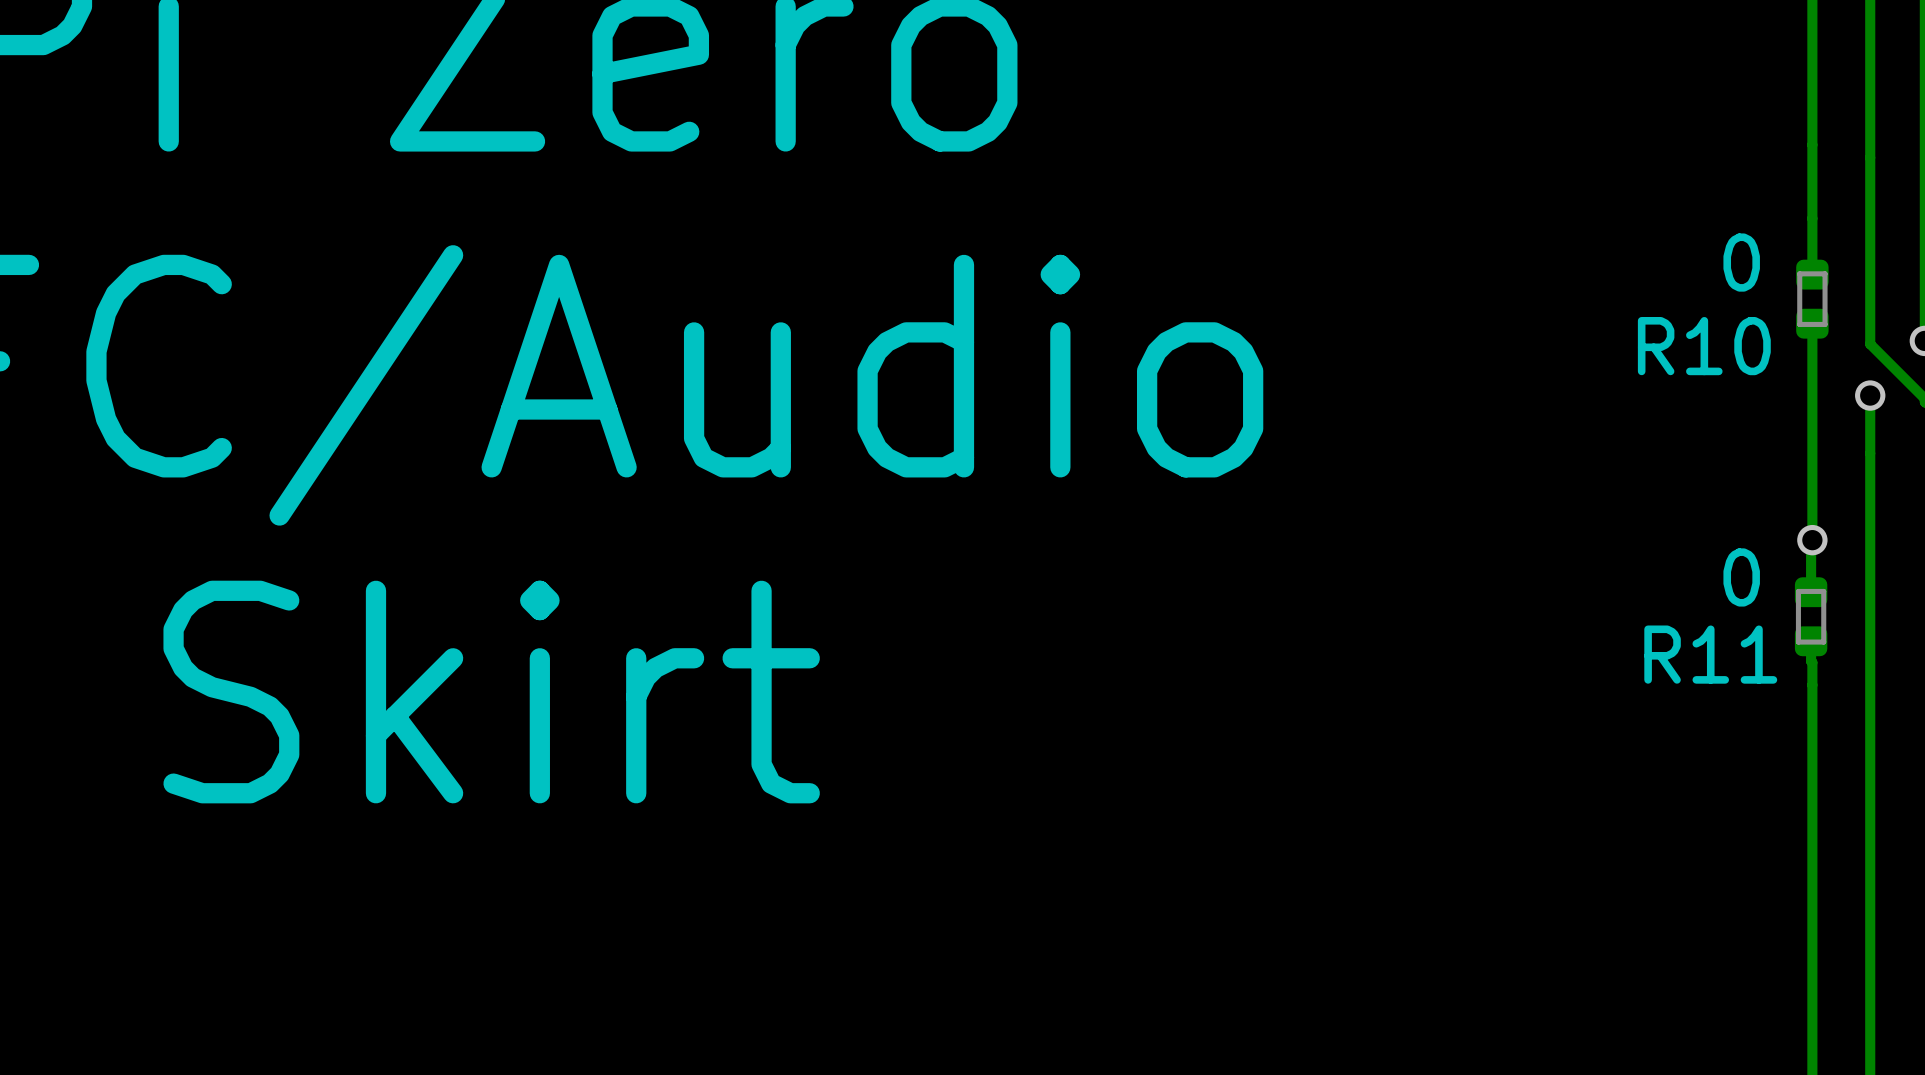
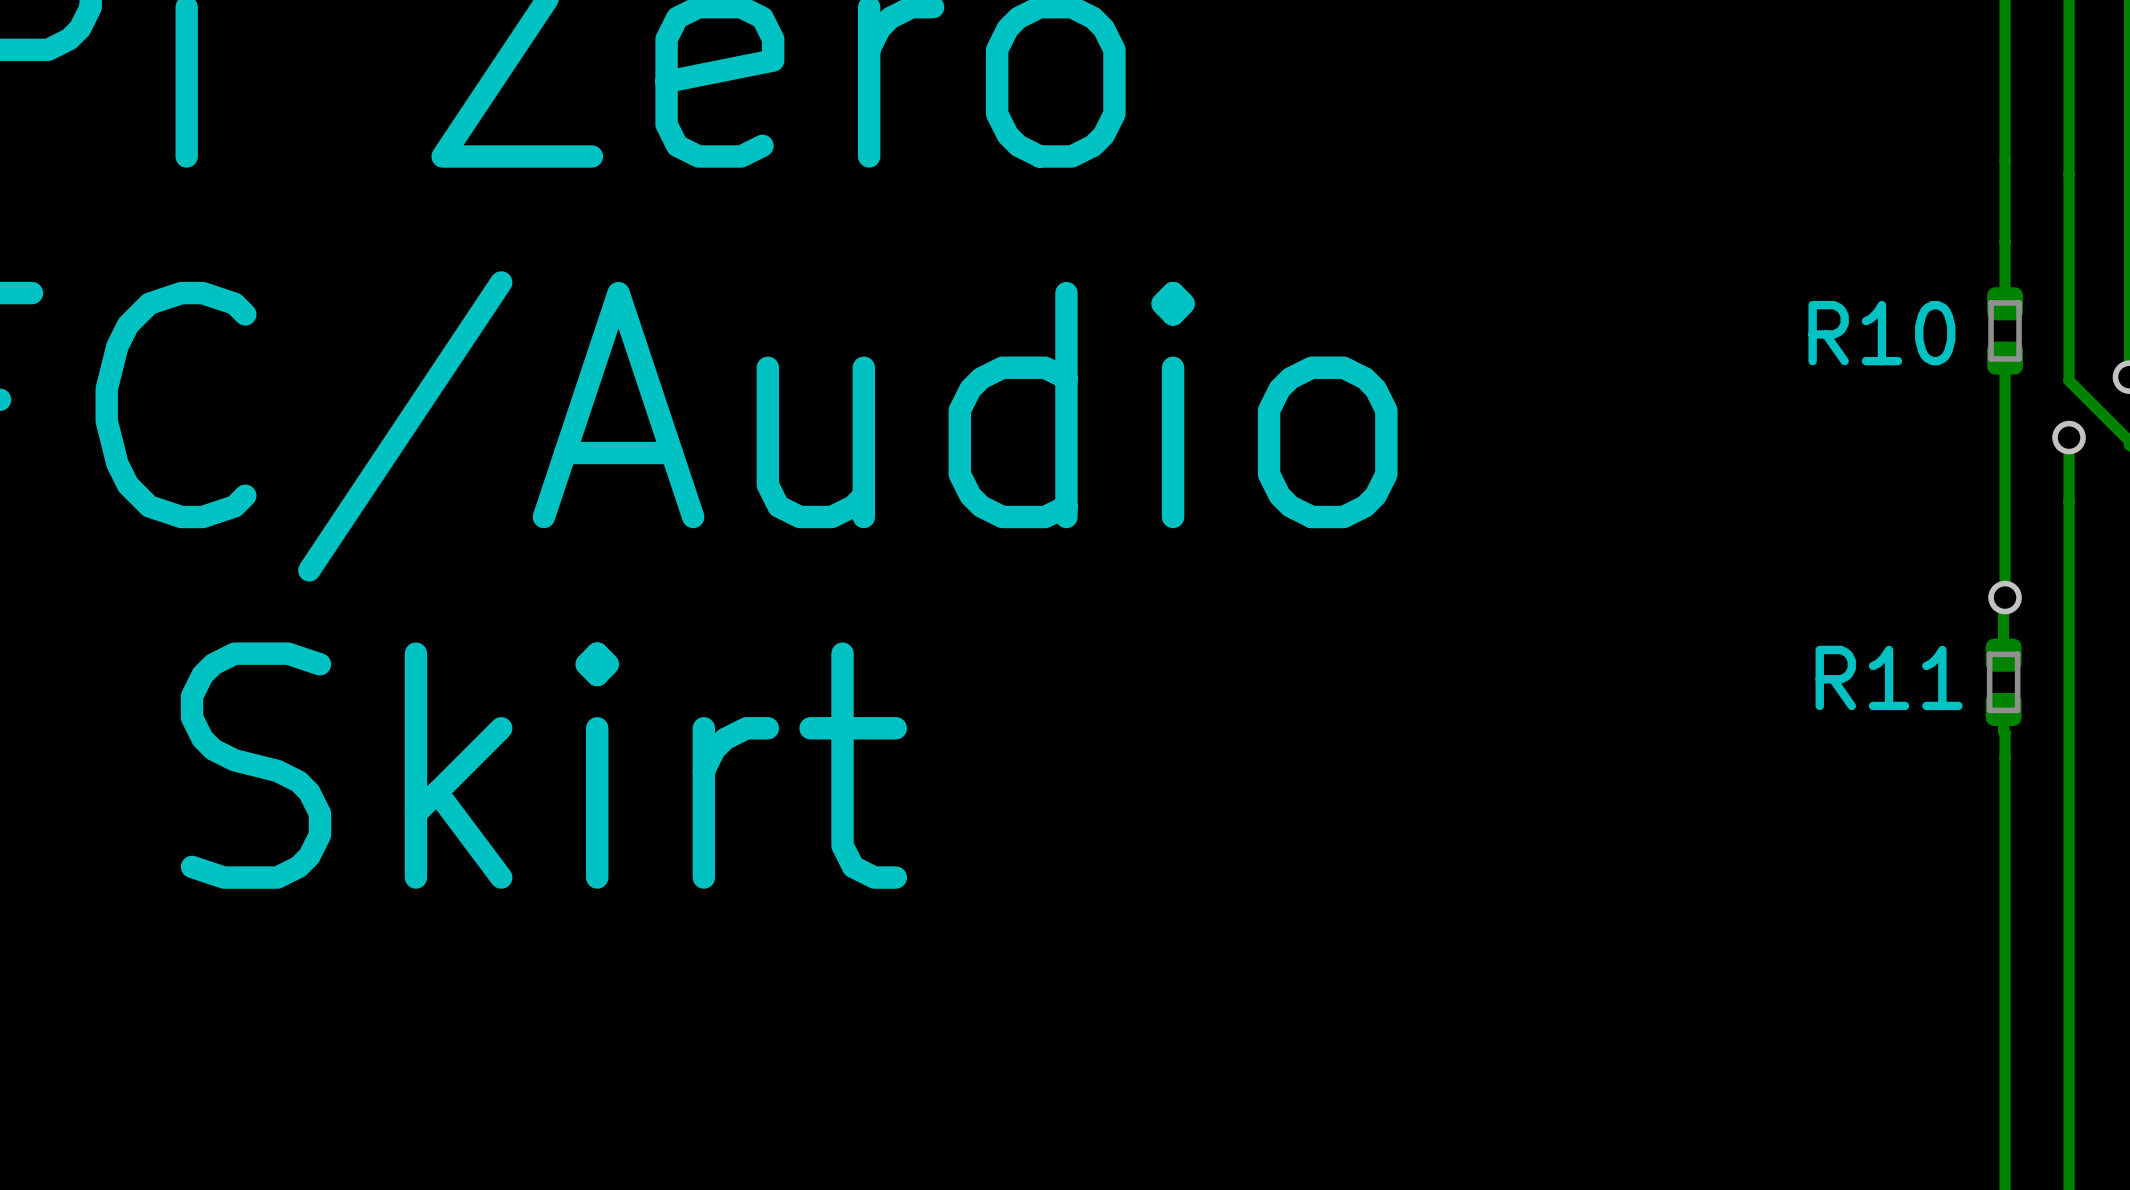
R10 value: 0 (1741, 262) -> none
R10 name position: R10 (1704, 346) -> R10 (1881, 333)
R11 value: 0 (1741, 577) -> none
R11 name position: R11 (1710, 654) -> R11 (1889, 677)

